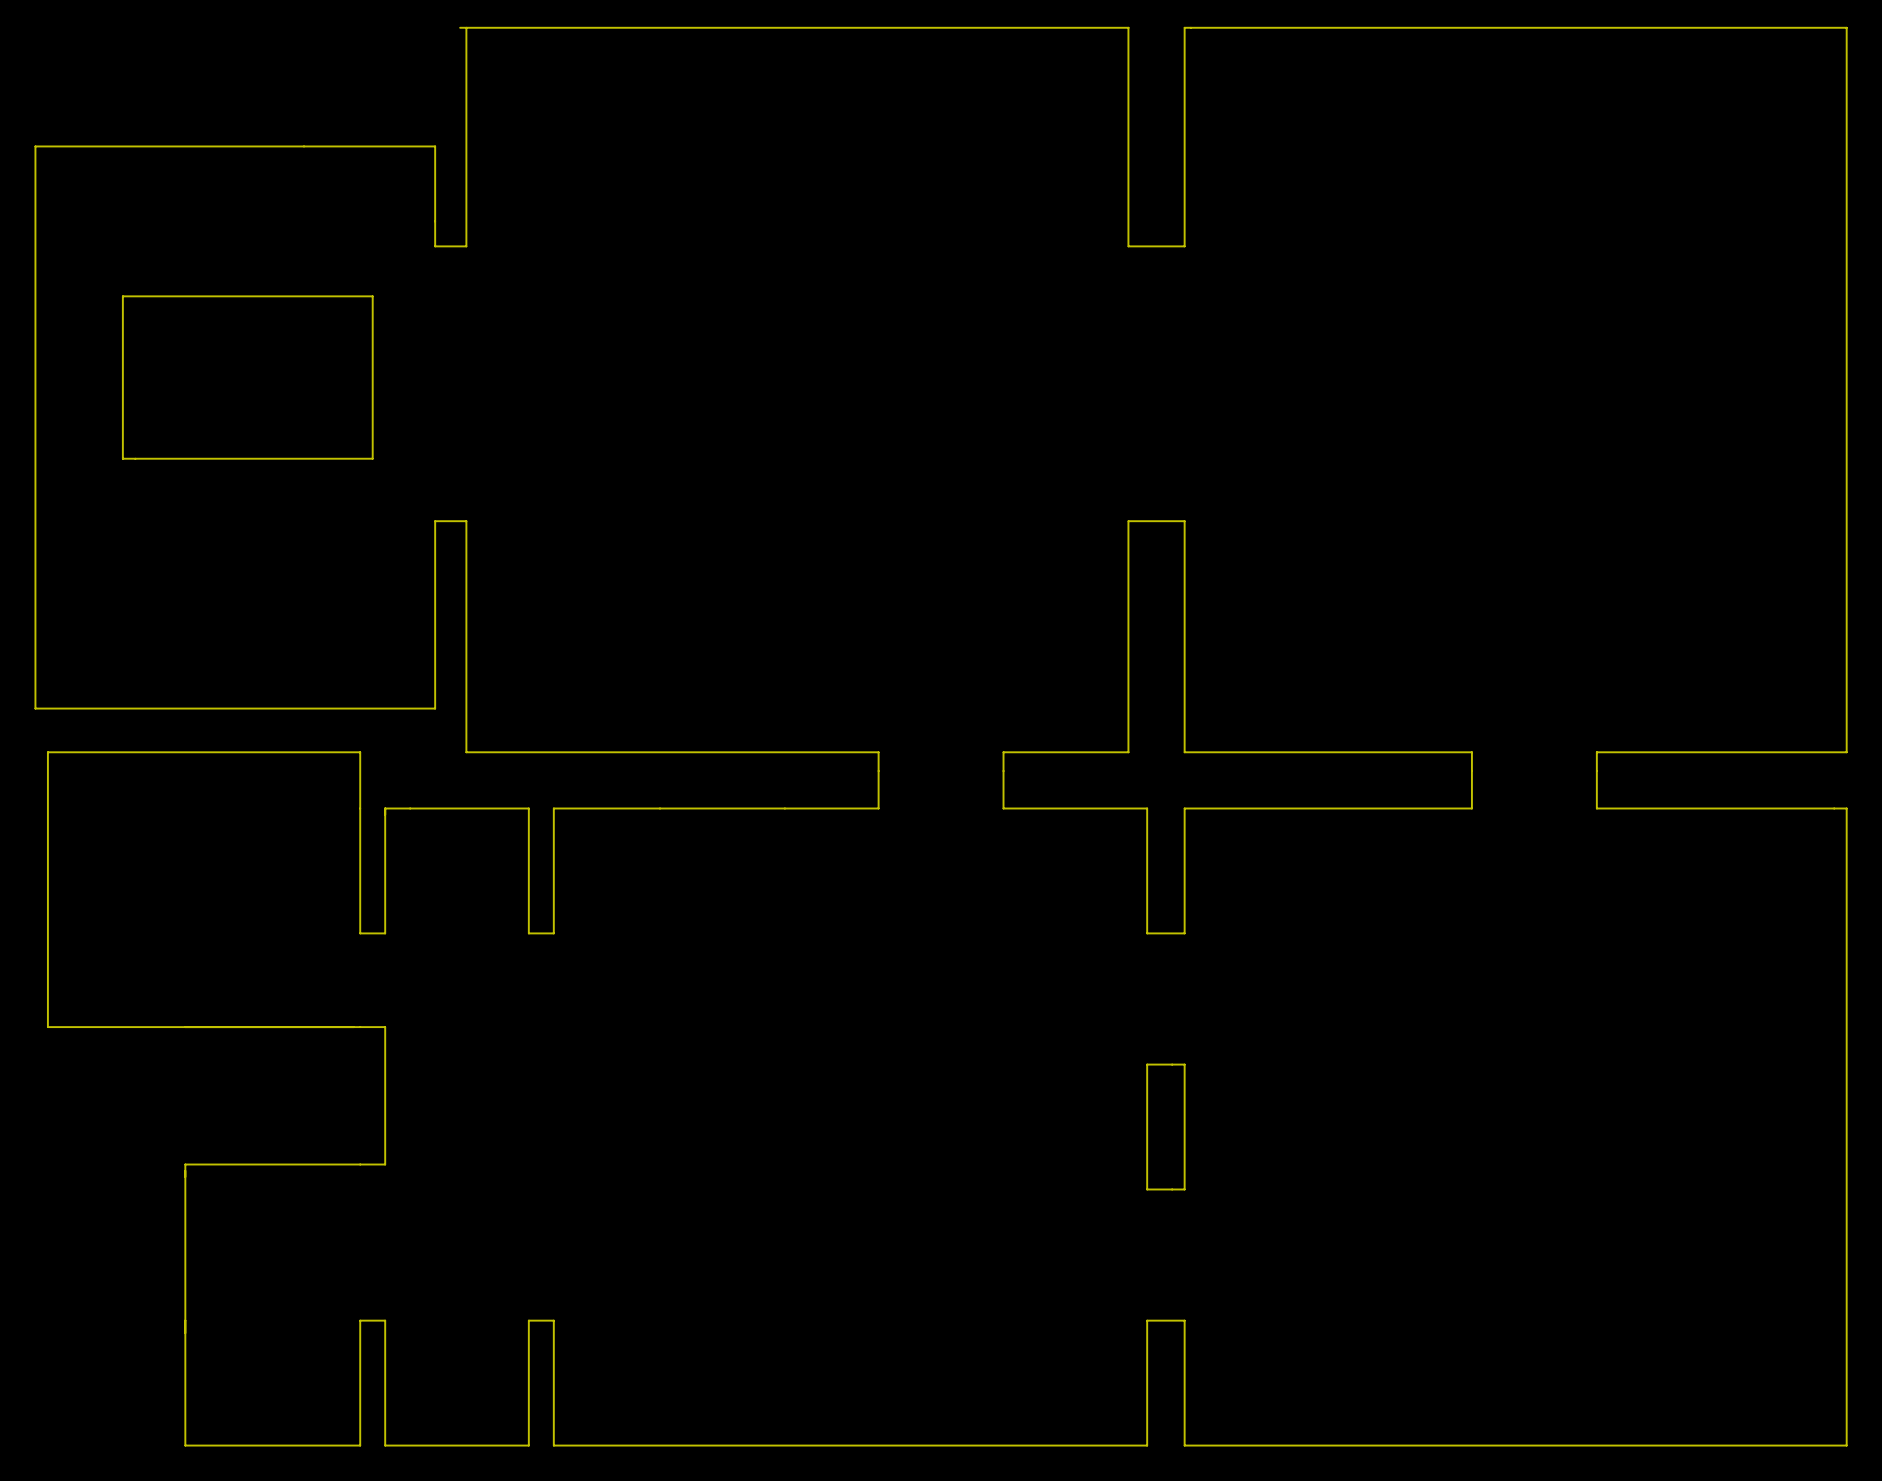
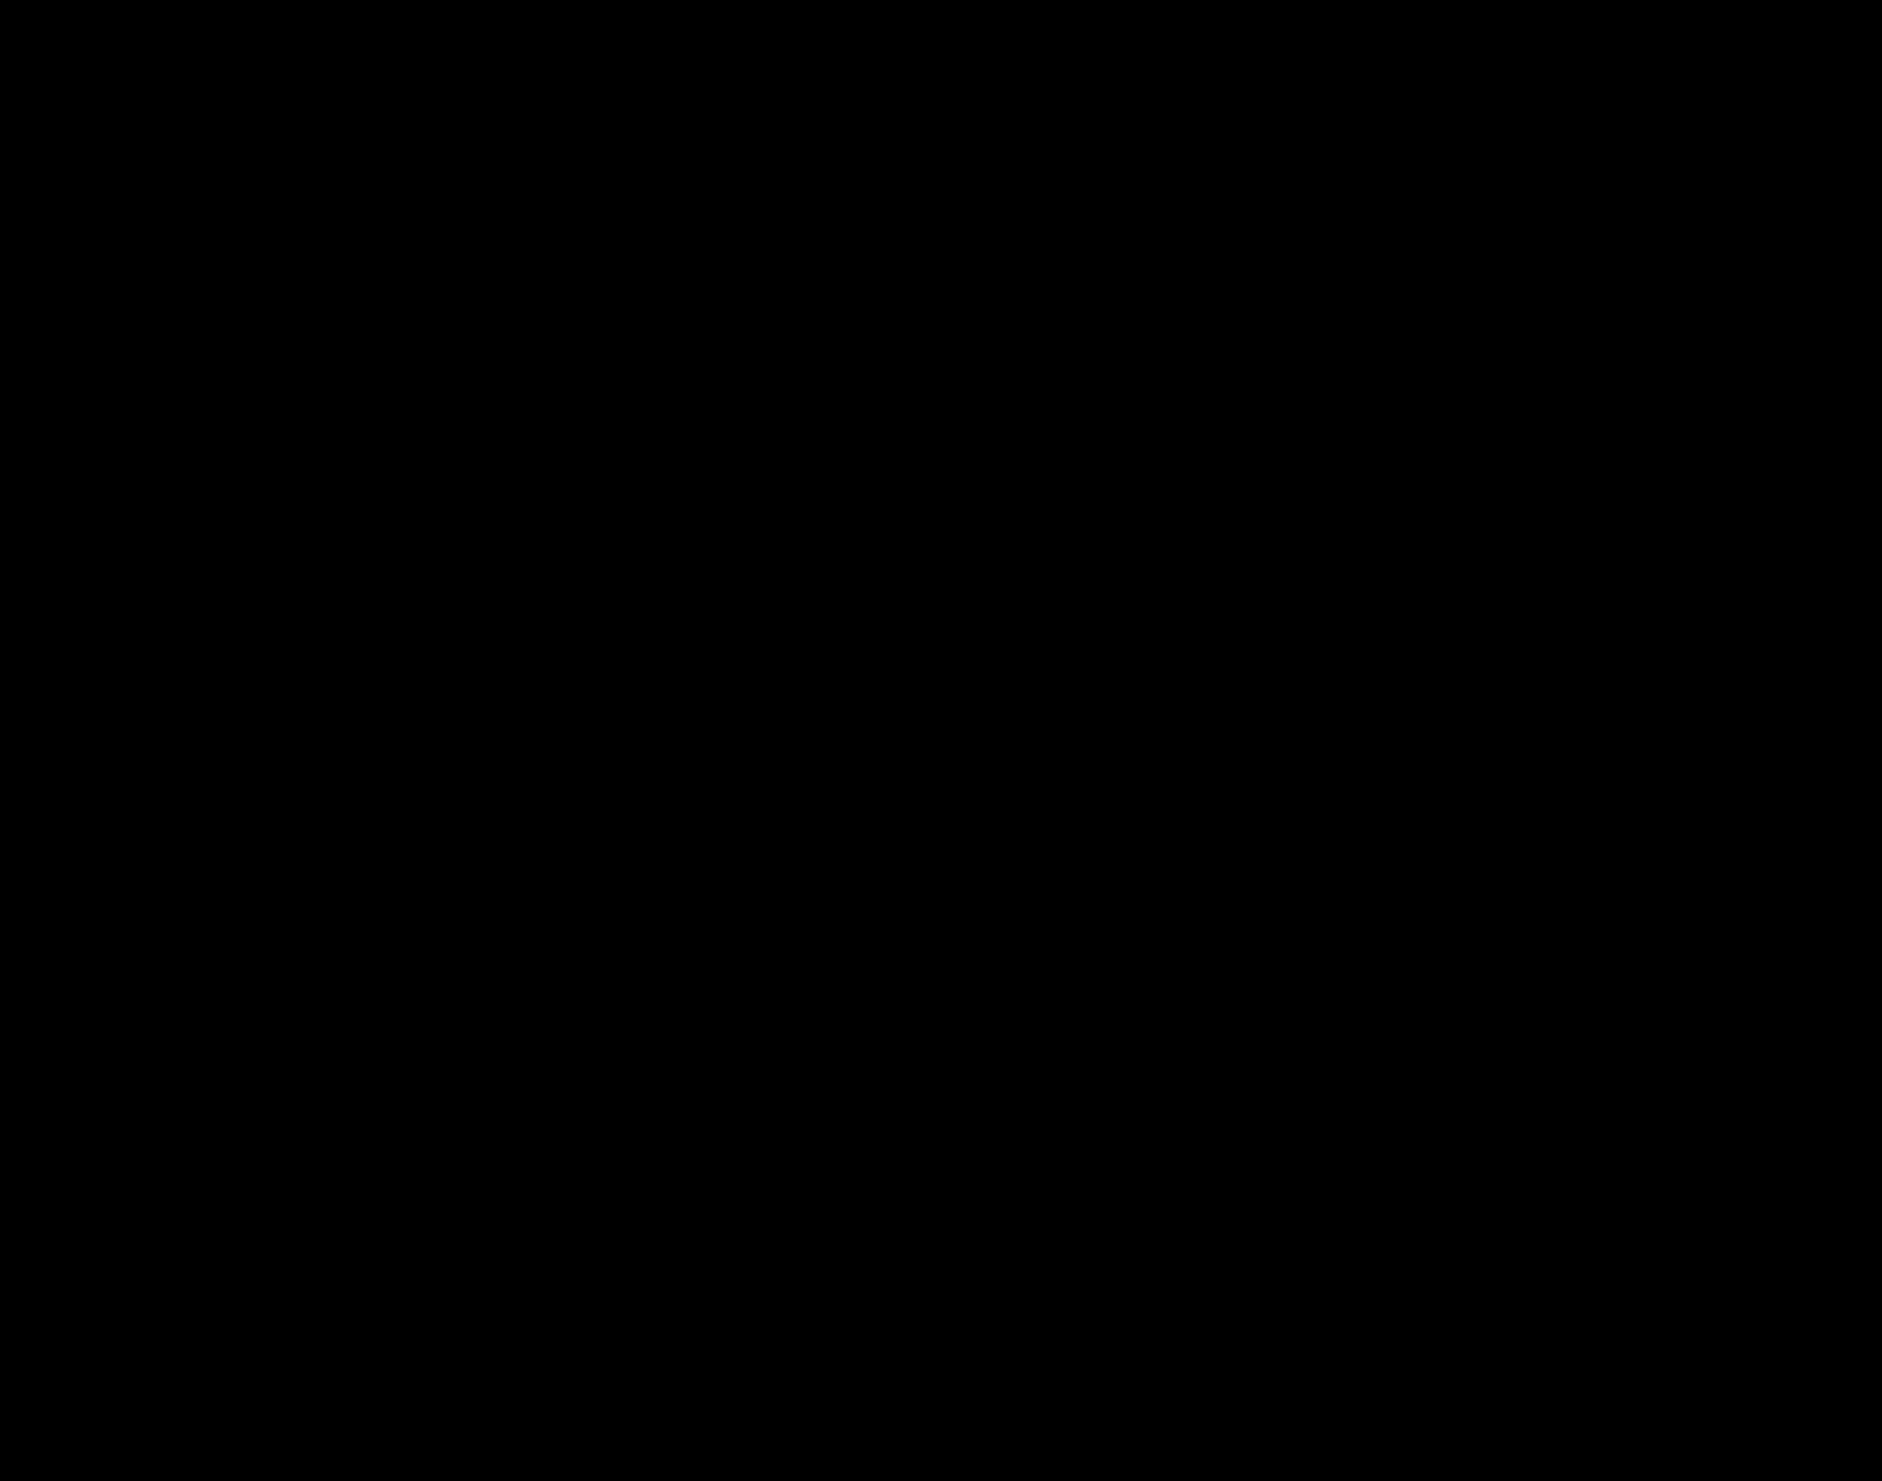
board edge: (460, 27) (1128, 27) -> none
board edge: (466, 27) (466, 246) (435, 246) (435, 146) (35, 146) (35, 708) (435, 708) (435, 521) (466, 521) (466, 752) (878, 752) (878, 808) (553, 808) (553, 933) (528, 933) (528, 808) (385, 808) (385, 933) (360, 933) (360, 752) (47, 752) (47, 1027) (385, 1027) (385, 1164) (185, 1164) (185, 1445) (360, 1445) (360, 1320) (385, 1320) (385, 1445) (528, 1445) (528, 1320) (553, 1320) (553, 1445) (1147, 1445) (1147, 1320) (1184, 1320) (1184, 1445) (1846, 1445) (1846, 808) (1596, 808) (1596, 752) (1846, 752) (1846, 27) (1184, 27) (1184, 246) (1128, 246) -> none
board edge: (1128, 27) (1128, 246) -> none
board edge: (122, 296) (122, 458) (372, 458) (372, 296) (122, 296) -> none
board edge: (1128, 521) (1128, 752) -> none
board edge: (1128, 521) (1184, 521) (1184, 752) (1471, 752) (1471, 808) (1184, 808) (1184, 933) (1147, 933) (1147, 808) (1003, 808) (1003, 752) (1128, 752) -> none
board edge: (1147, 1064) (1184, 1064) (1184, 1189) (1147, 1189) (1147, 1064) -> none

